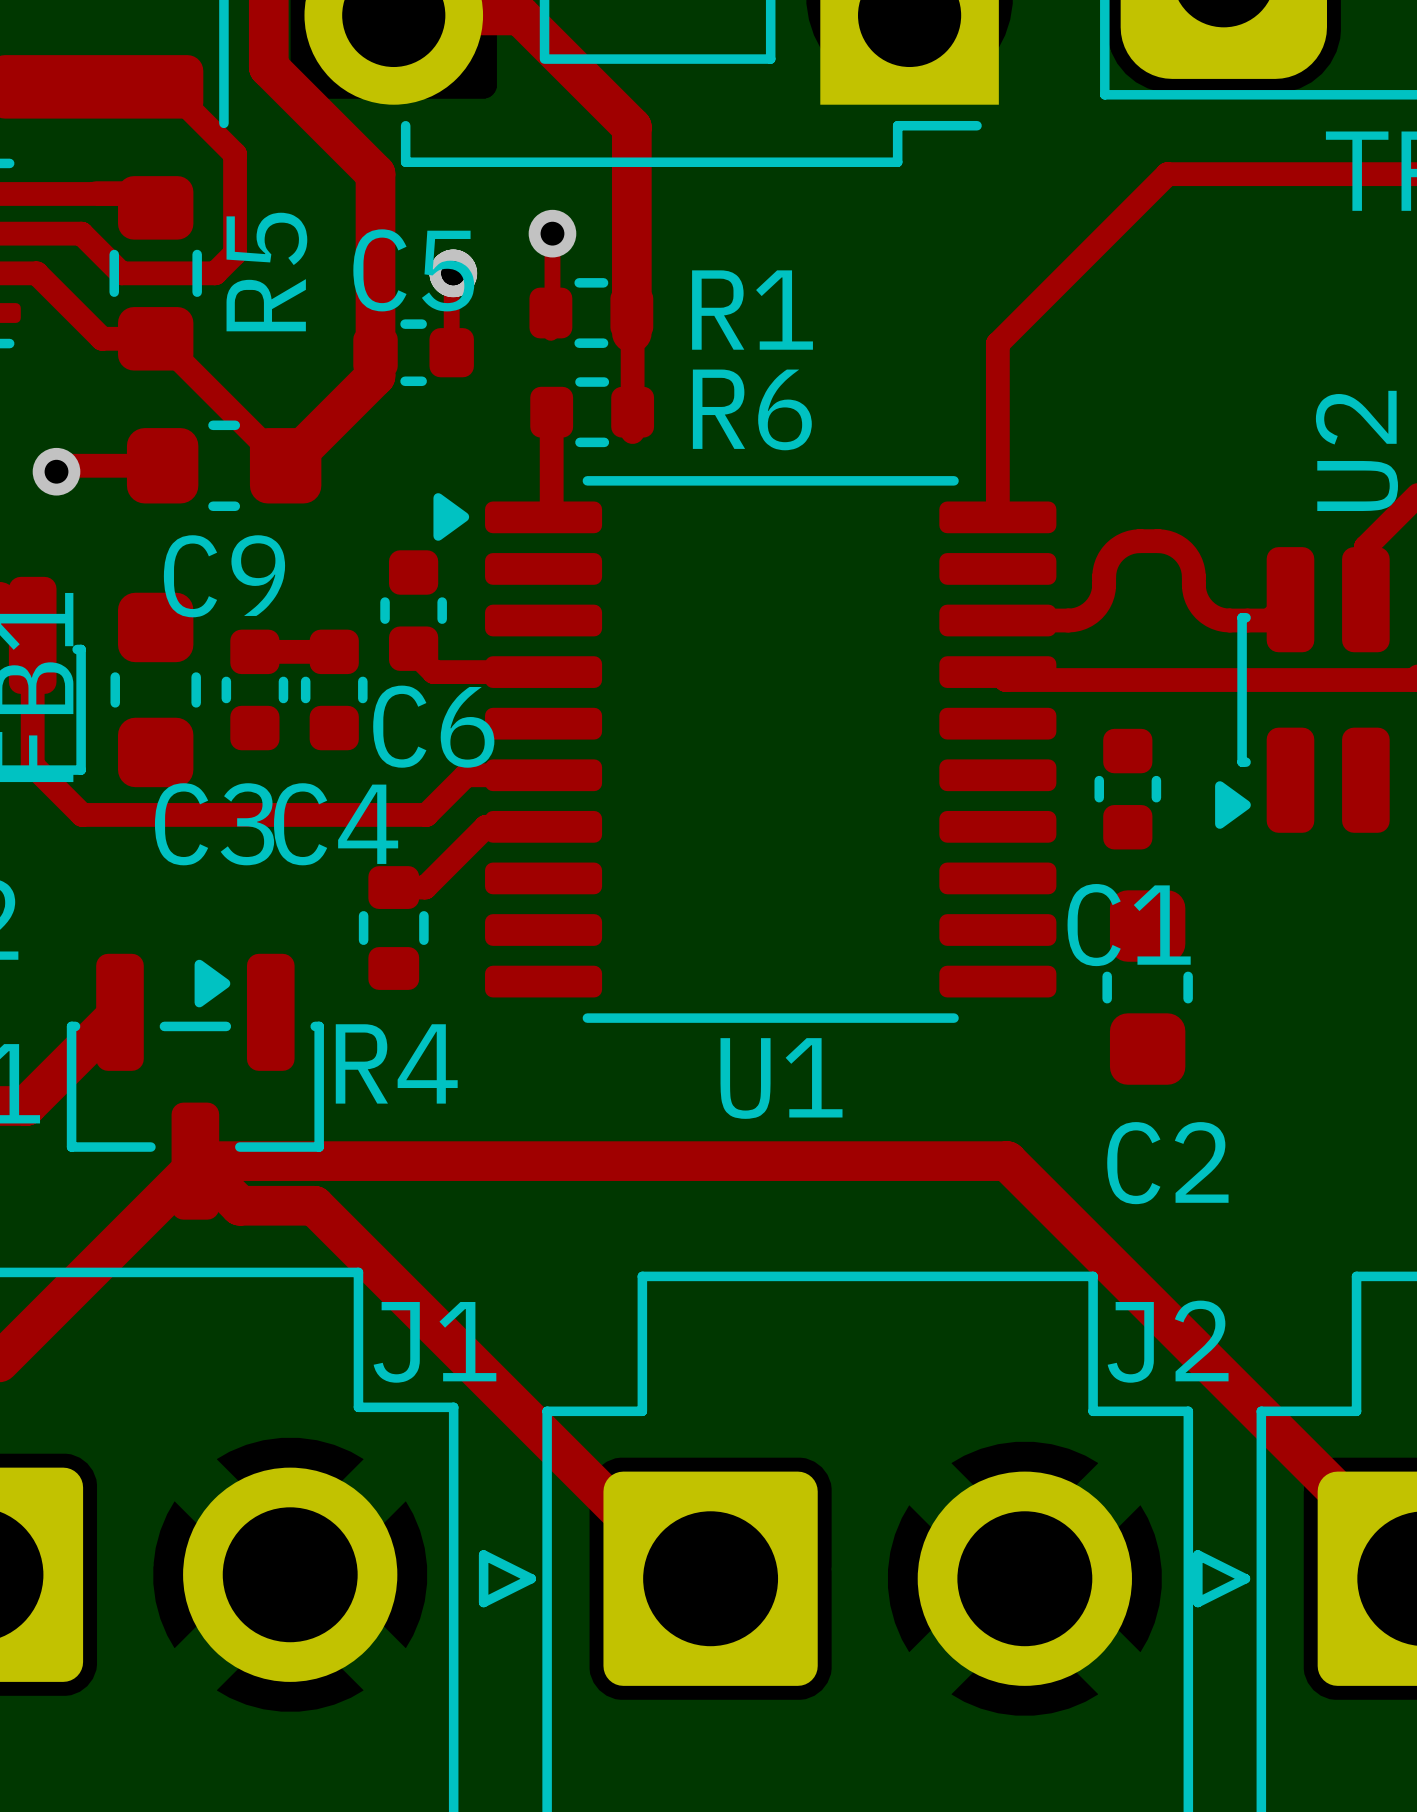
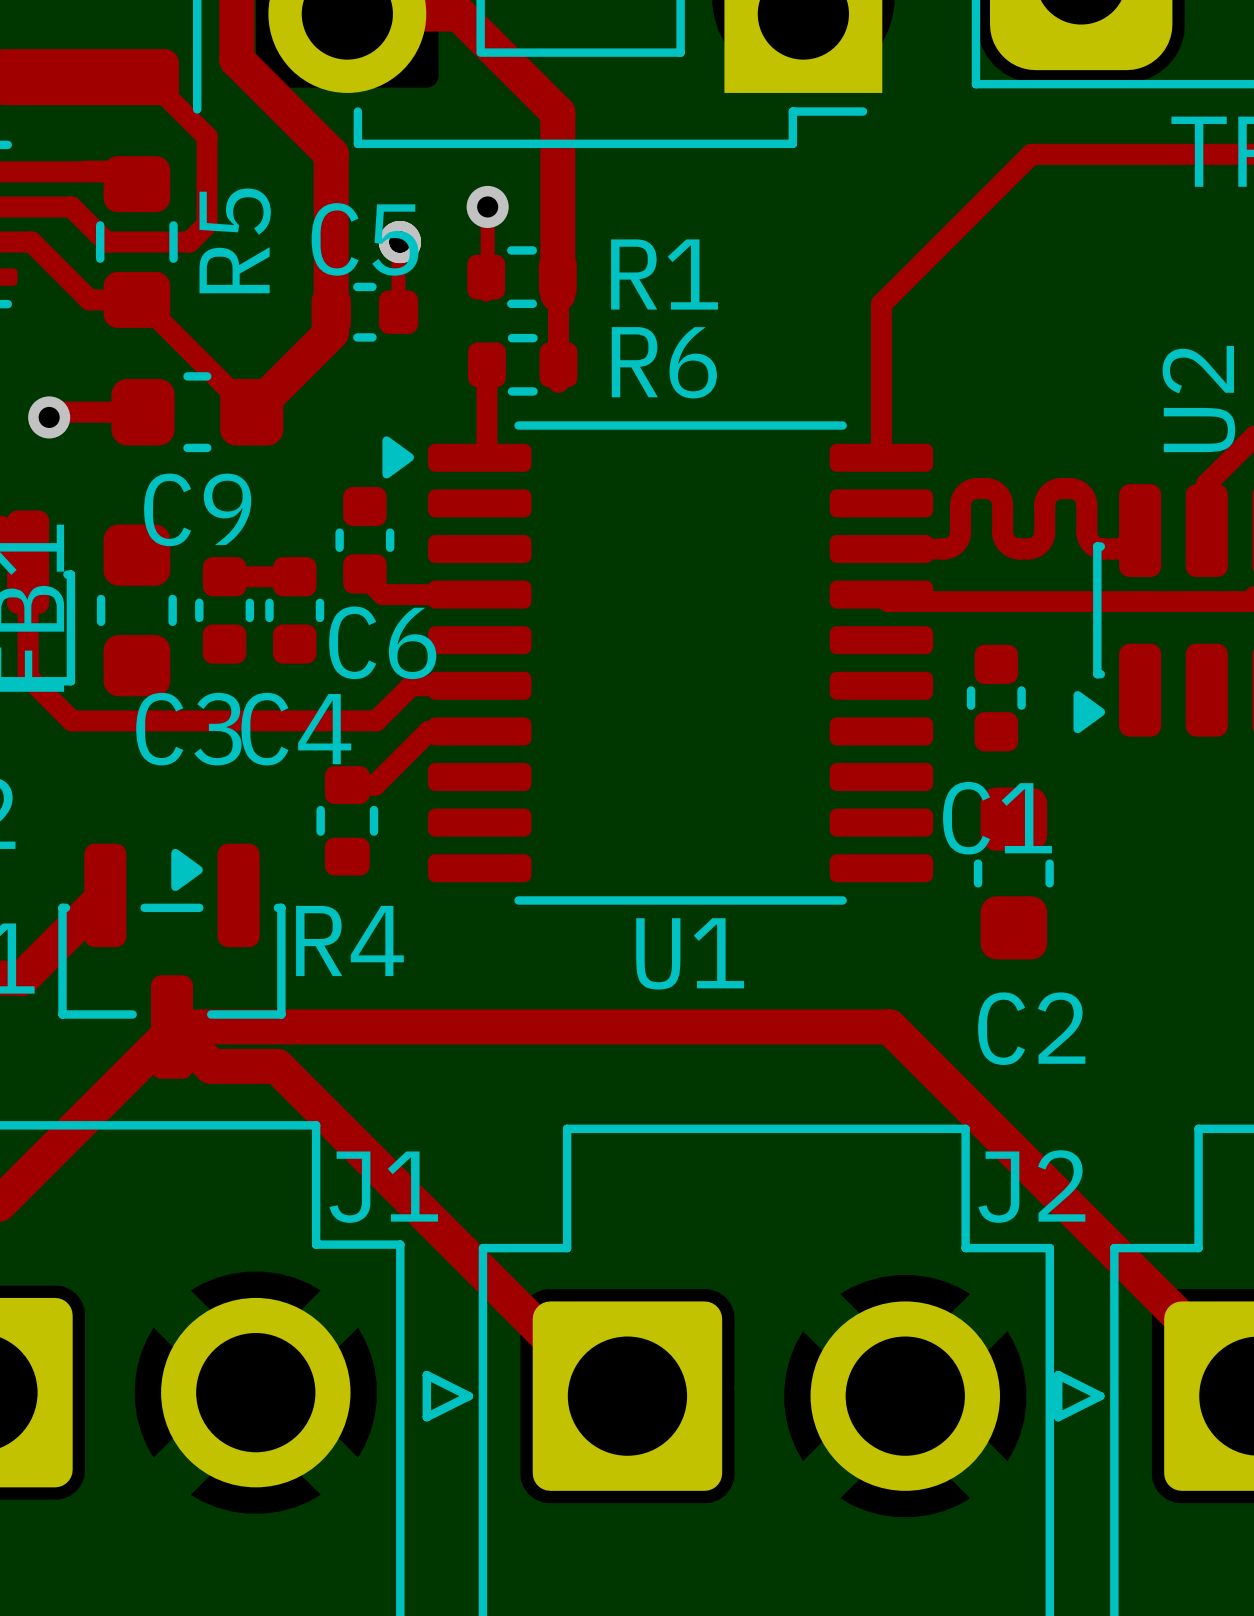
top track: (1068, 620) (1086, 615) (1096, 606) (1102, 593) (1105, 567) (1114, 551) (1126, 543) (1140, 541) (1167, 542) (1183, 551) (1192, 567) (1196, 598) (1207, 613) (1225, 620) (1249, 620) -> (943, 548) (954, 545) (959, 537) (960, 503) (963, 496) (970, 490) (977, 488) (991, 489) (1000, 498) (1002, 534) (1007, 544) (1017, 548) (1035, 547) (1041, 542) (1044, 535) (1046, 498) (1052, 491) (1061, 488) (1075, 489) (1084, 496) (1086, 503) (1087, 537) (1094, 546) (1103, 548)

